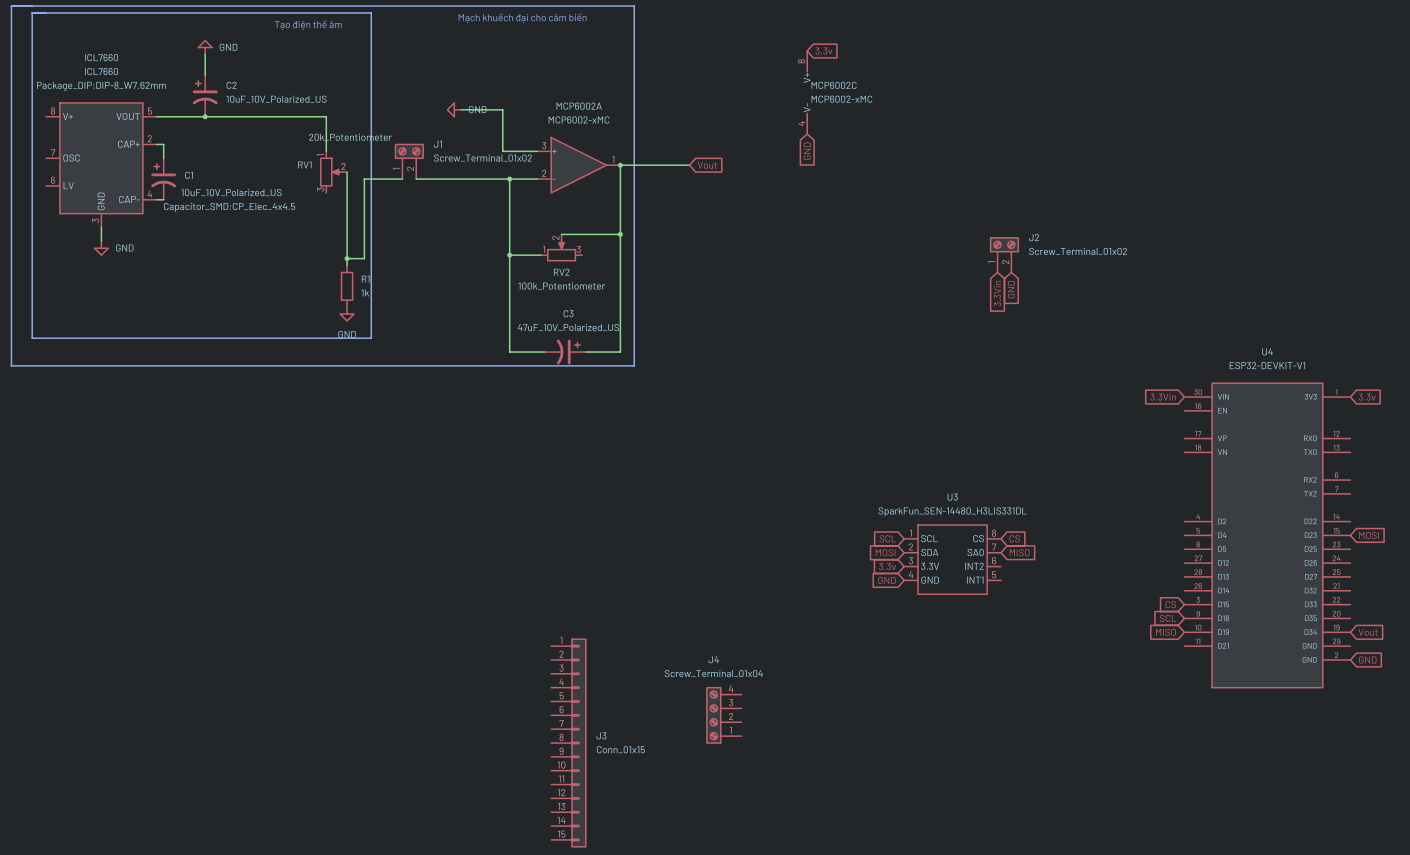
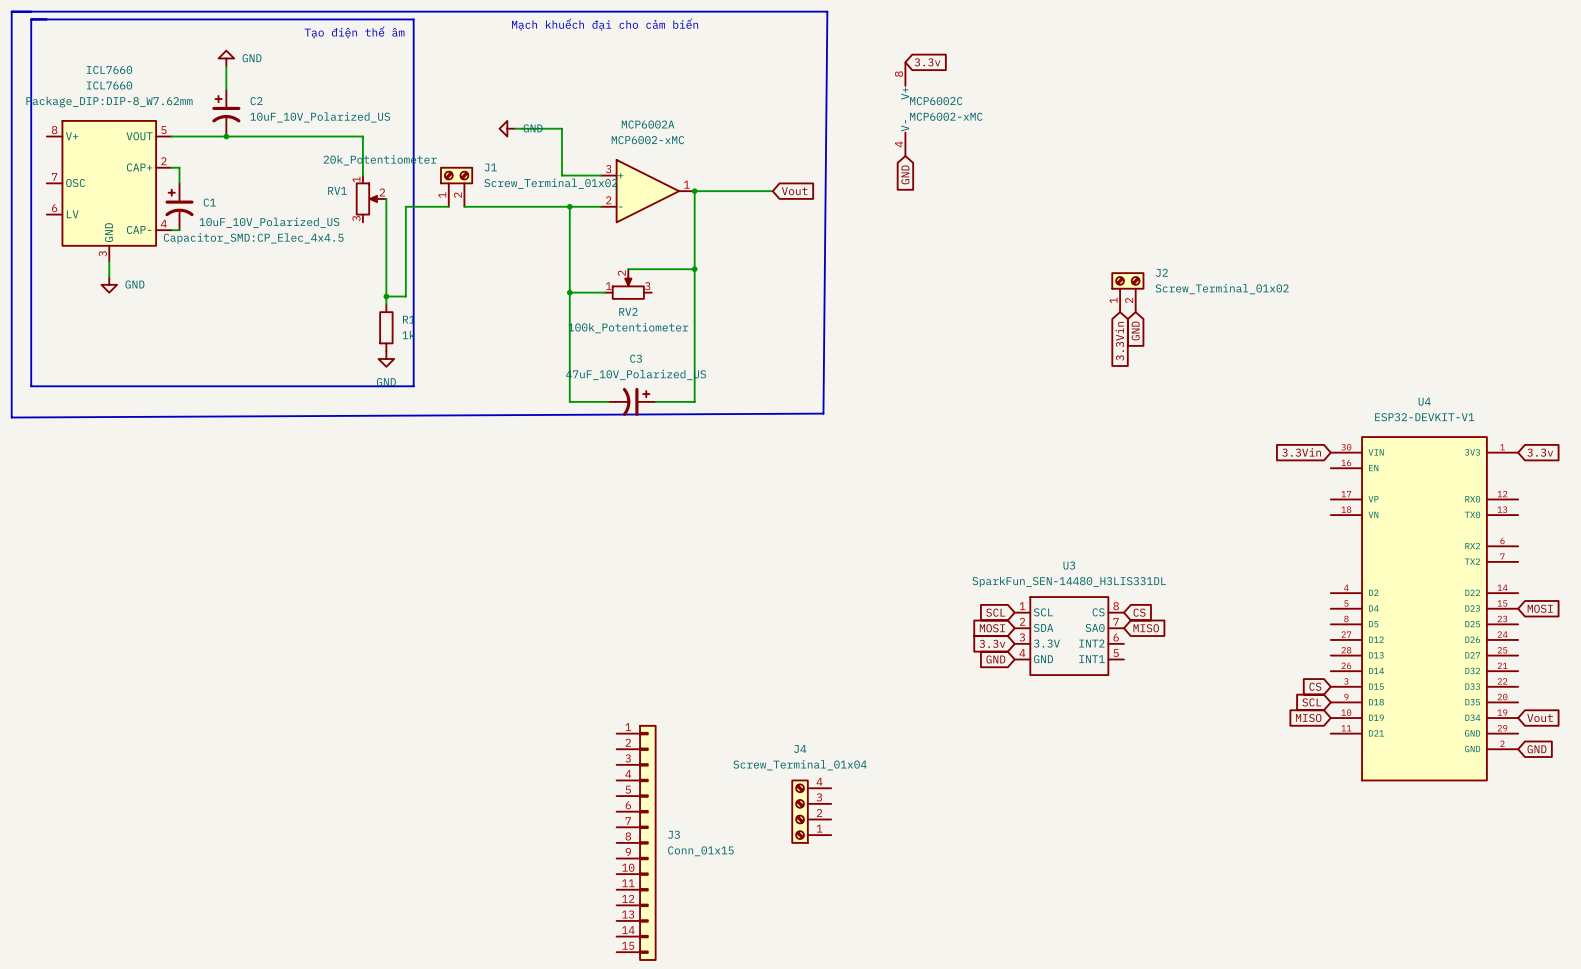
line: (14, 6) (11, 6) (11, 365) (634, 365) (634, 6) -> (11, 11) (11, 417) (823, 413) (827, 11) (710, 11)

